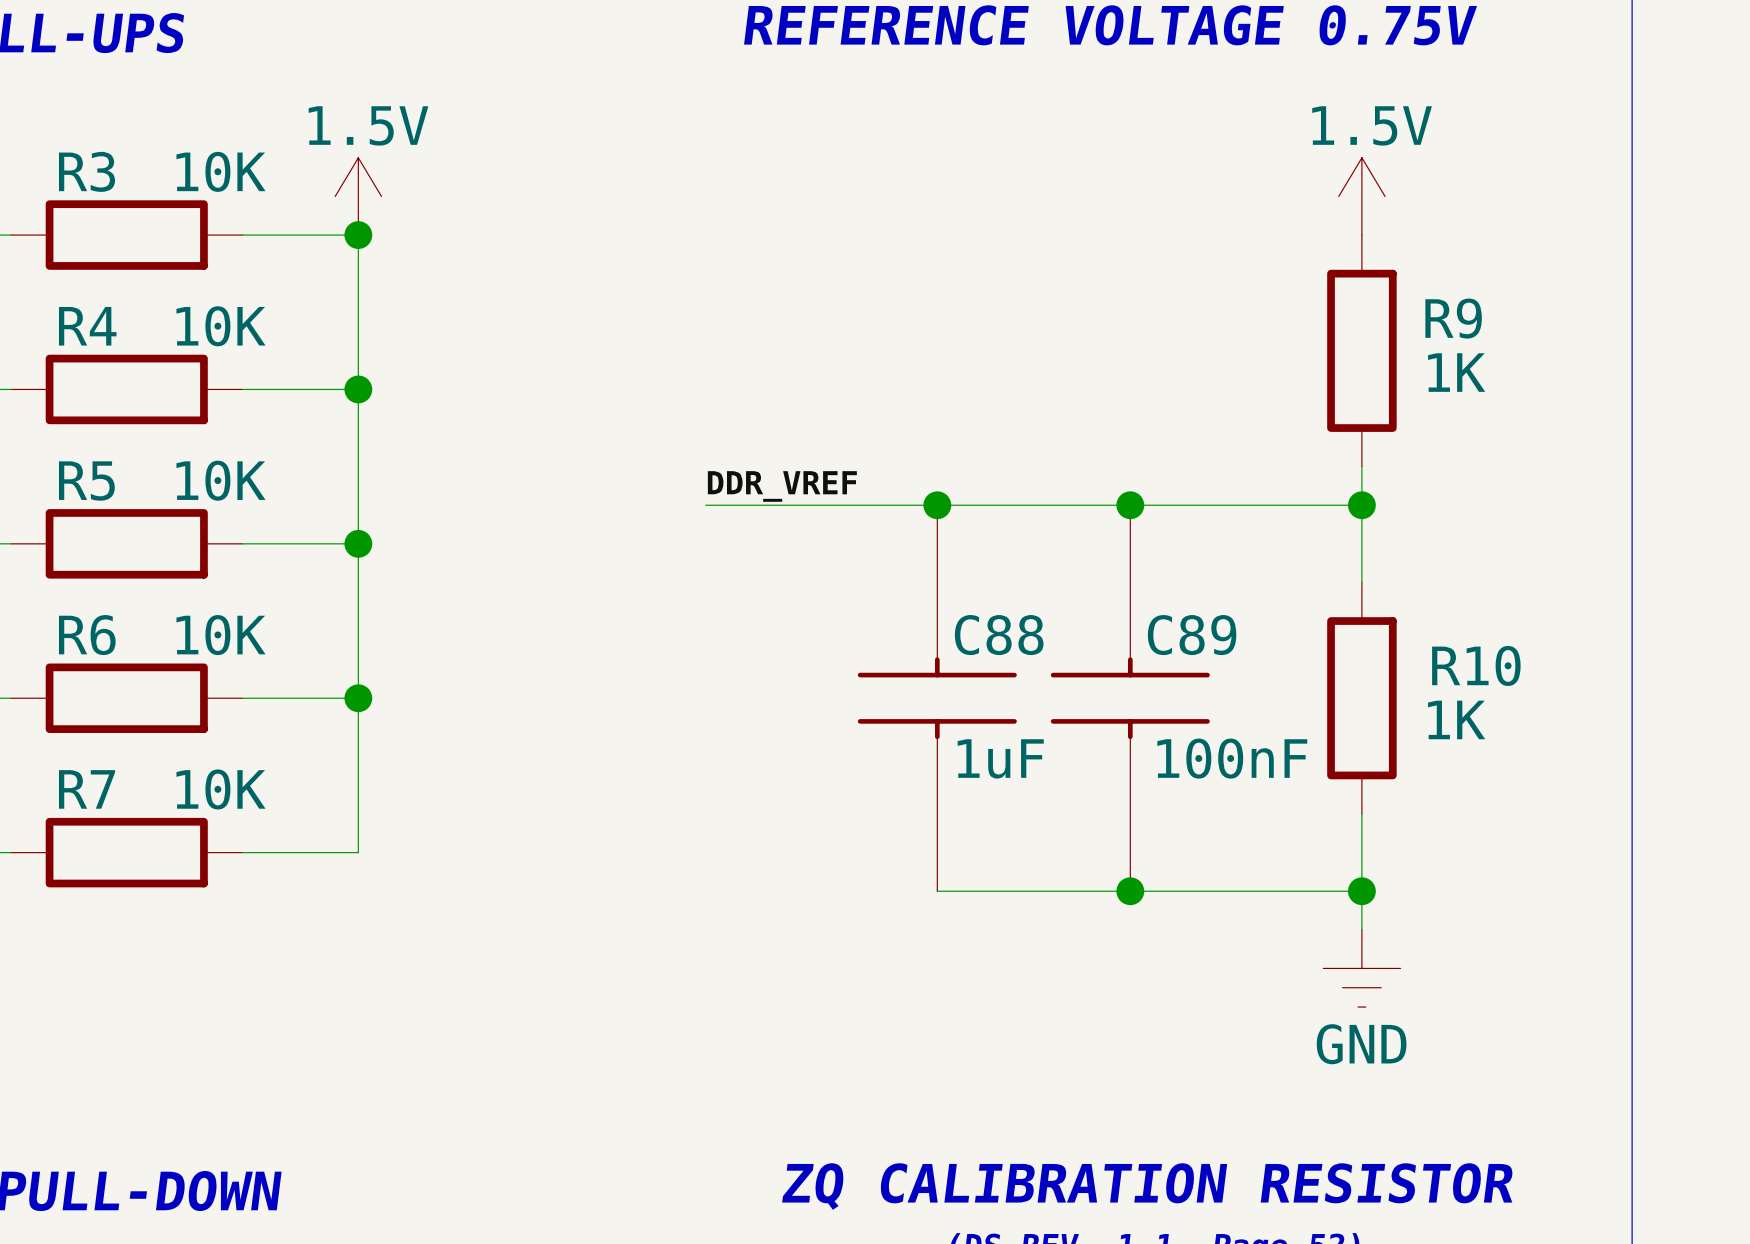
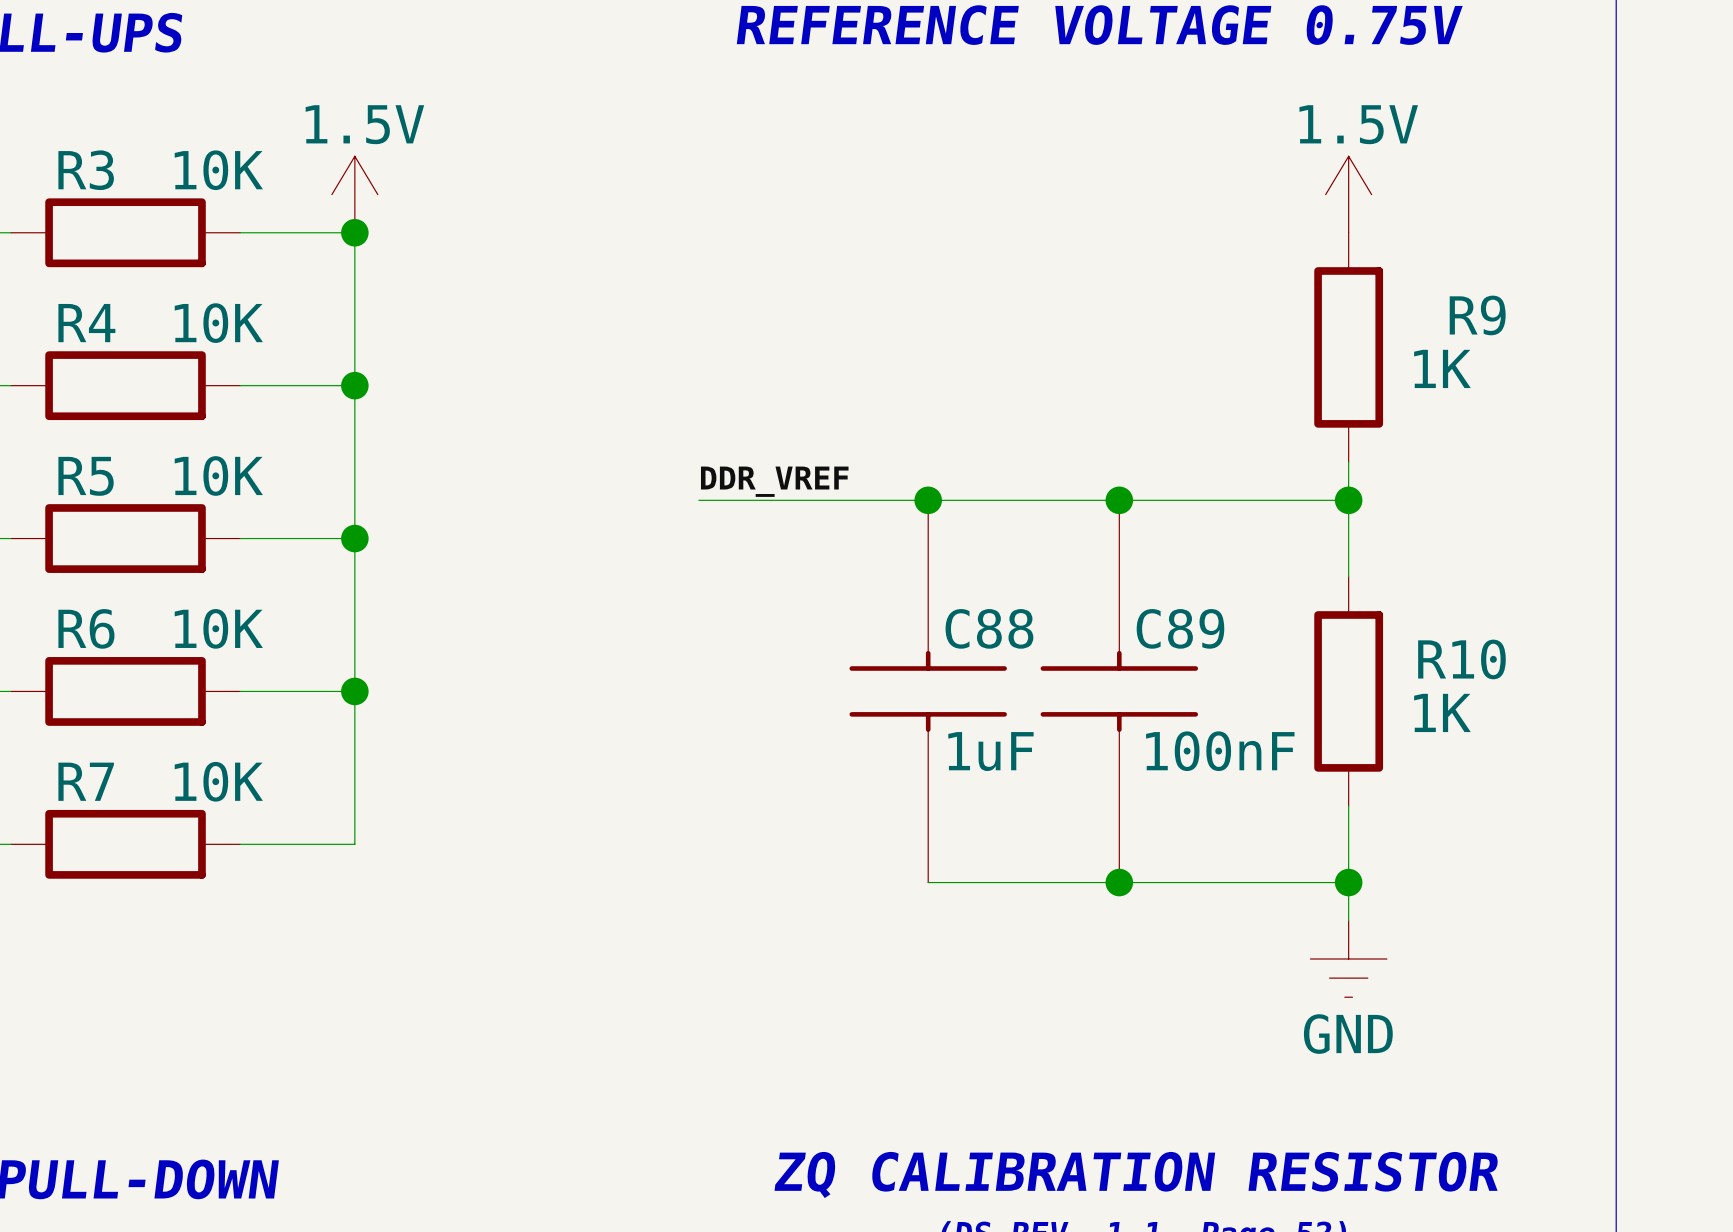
R9 name position: R9 (1453, 318) -> R9 (1477, 315)

